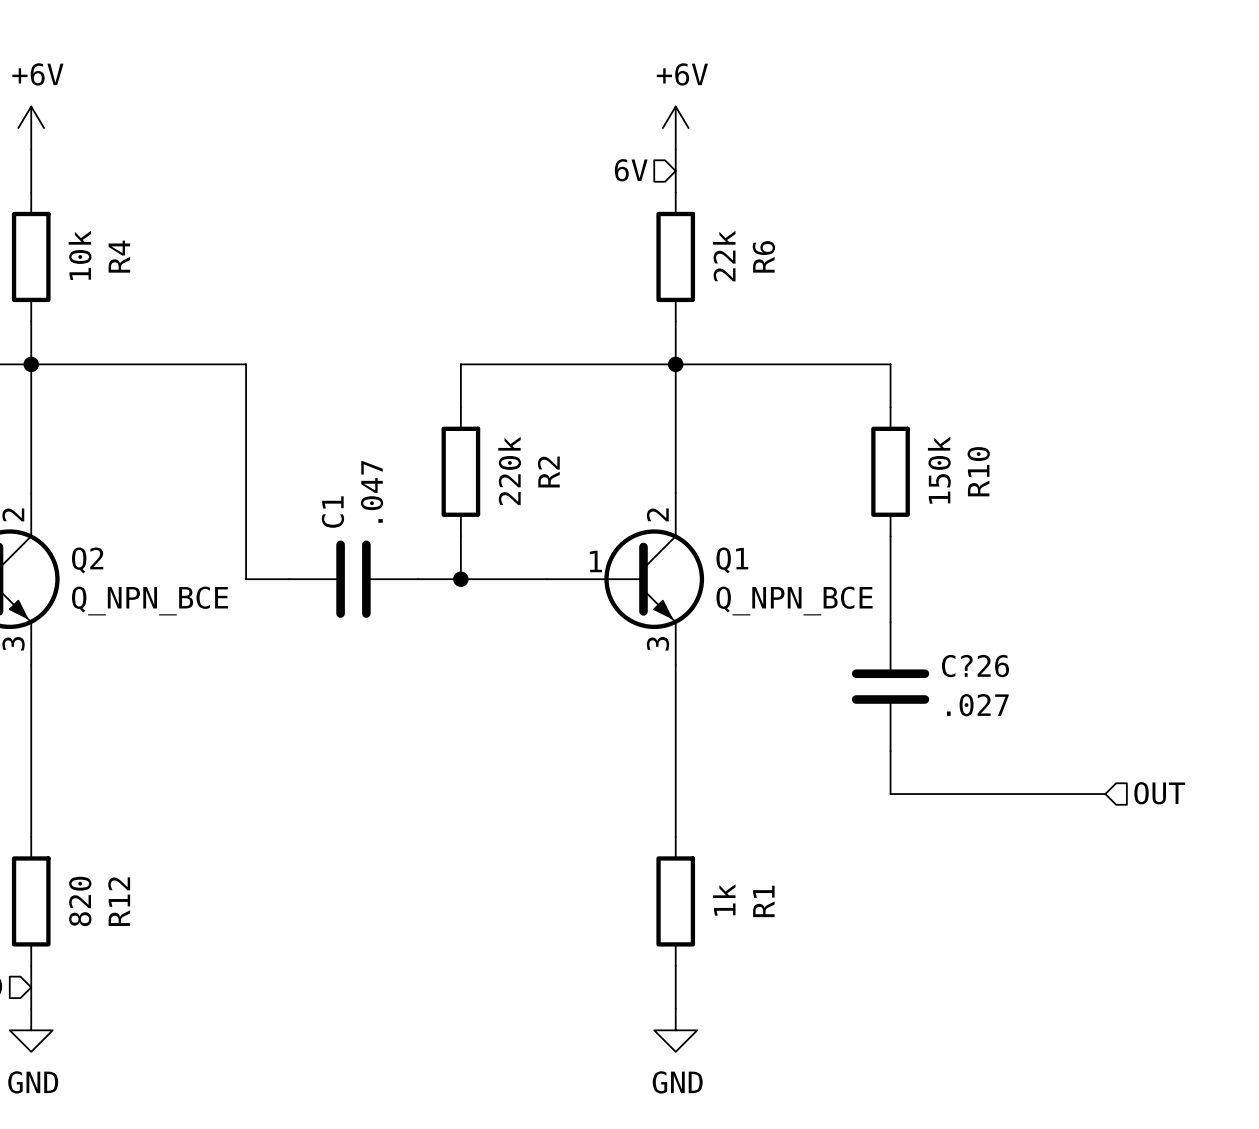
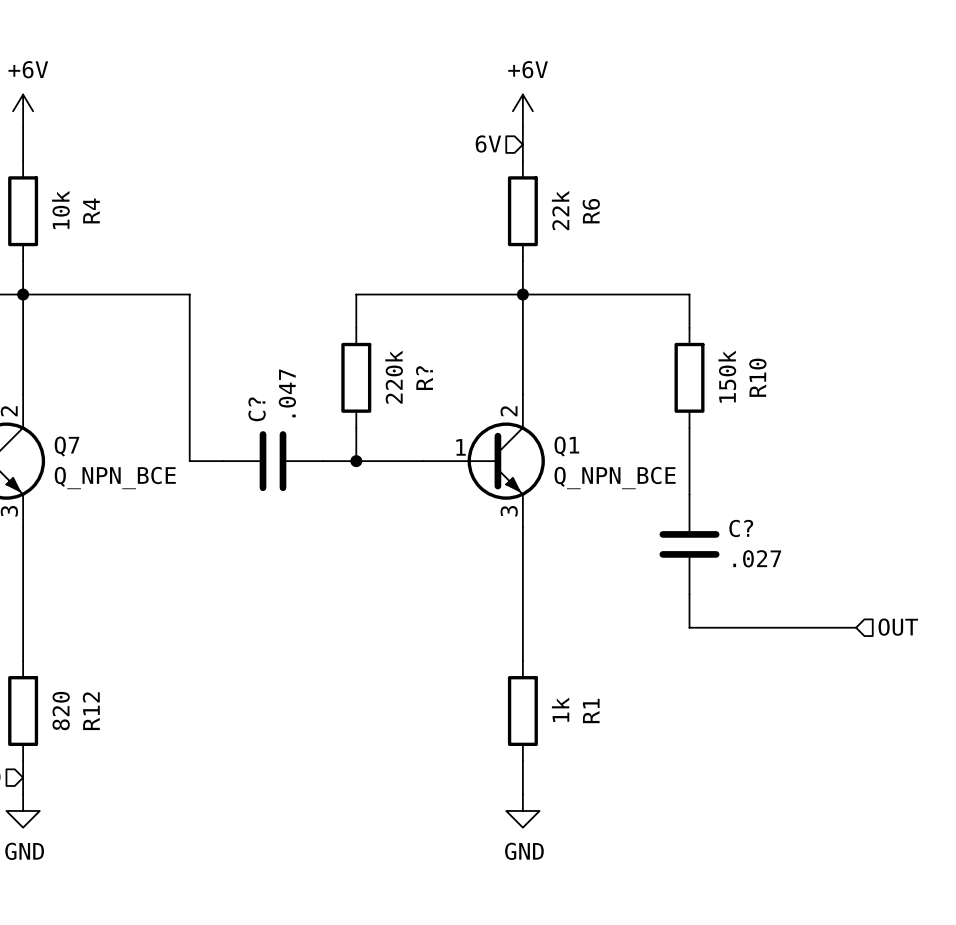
R2 name: R2 (548, 472) -> R? (424, 378)
C1 name: C1 (332, 512) -> C? (257, 409)
Q2 name: Q2 (87, 560) -> Q7 (66, 446)
C?26 name: C?26 (975, 666) -> C? (741, 528)

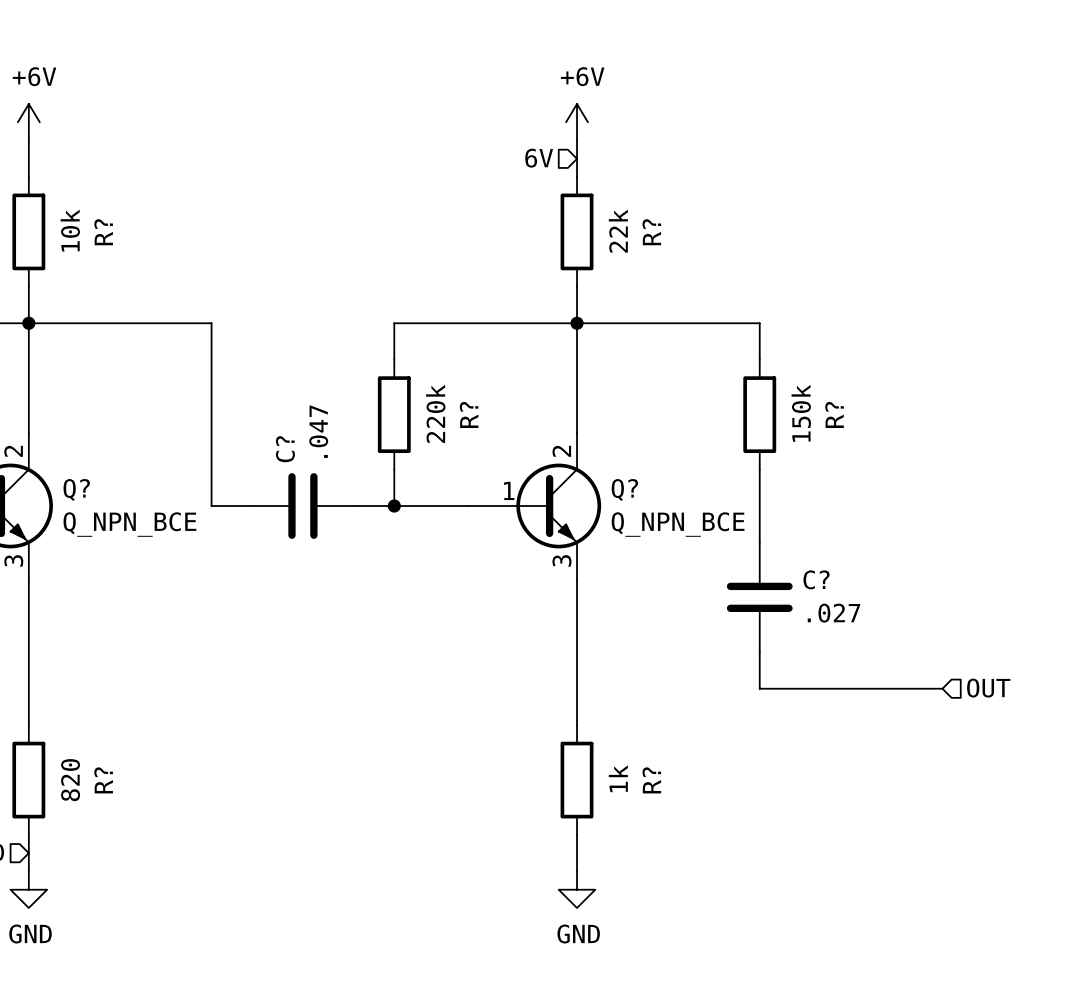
R4 name: R4 (91, 210) -> R? (103, 232)
R6 name: R6 (591, 211) -> R? (651, 232)
R10 name: R10 (757, 377) -> R? (834, 414)
Q7 name: Q7 (66, 446) -> Q? (76, 489)
Q1 name: Q1 (566, 446) -> Q? (624, 489)
R12 name: R12 (91, 711) -> R? (103, 780)
R1 name: R1 (591, 711) -> R? (651, 780)

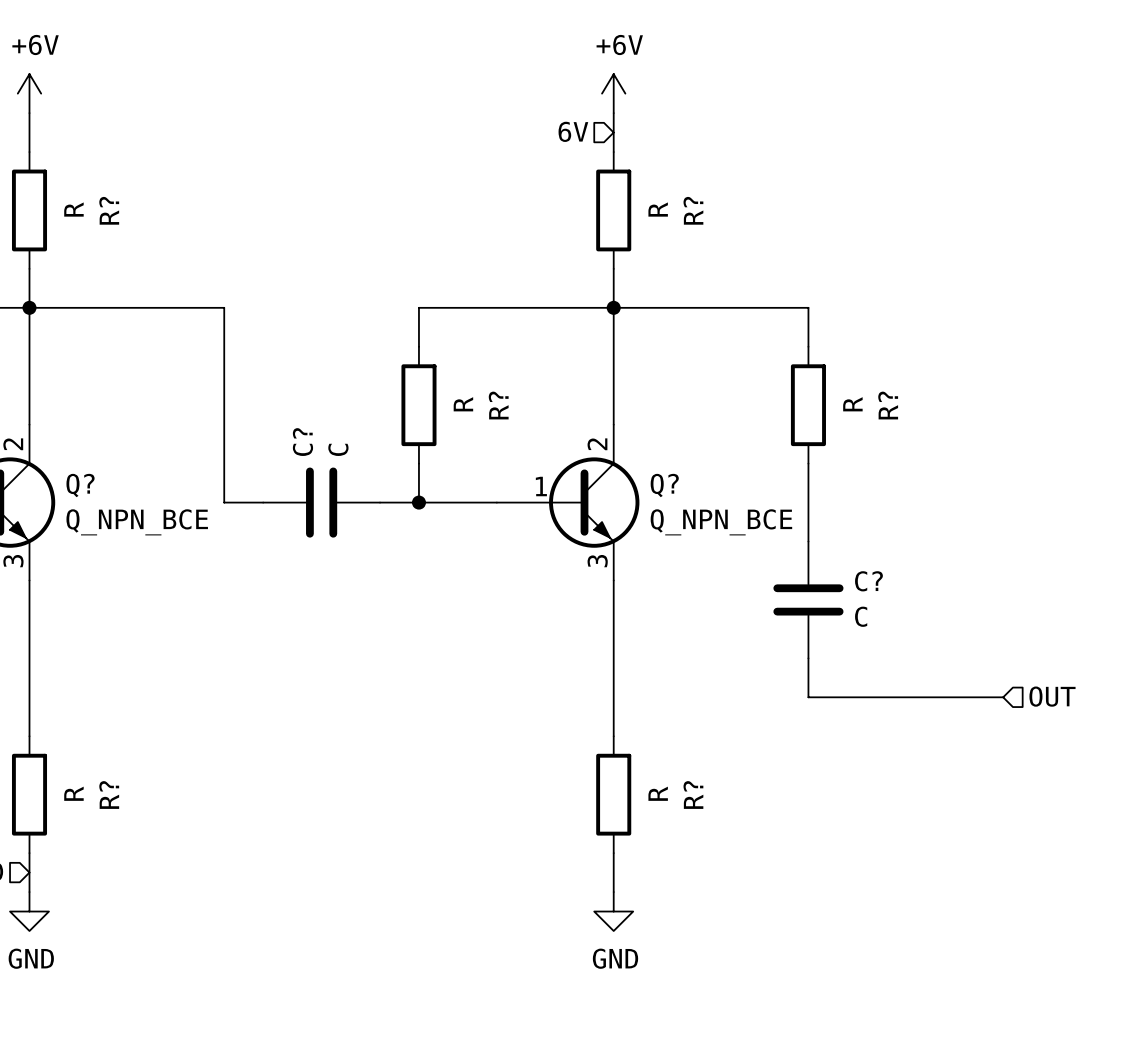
R? value: 10k (70, 230) -> R (73, 209)
R? value: 22k (618, 231) -> R (658, 209)
R? value: 220k (435, 413) -> R (463, 404)
R? value: 150k (801, 413) -> R (852, 404)
C? value: .047 (318, 431) -> C (338, 449)
C? value: .027 (834, 613) -> C (861, 616)
R? value: 1k (618, 778) -> R (658, 793)
R? value: 820 (70, 780) -> R (73, 793)

